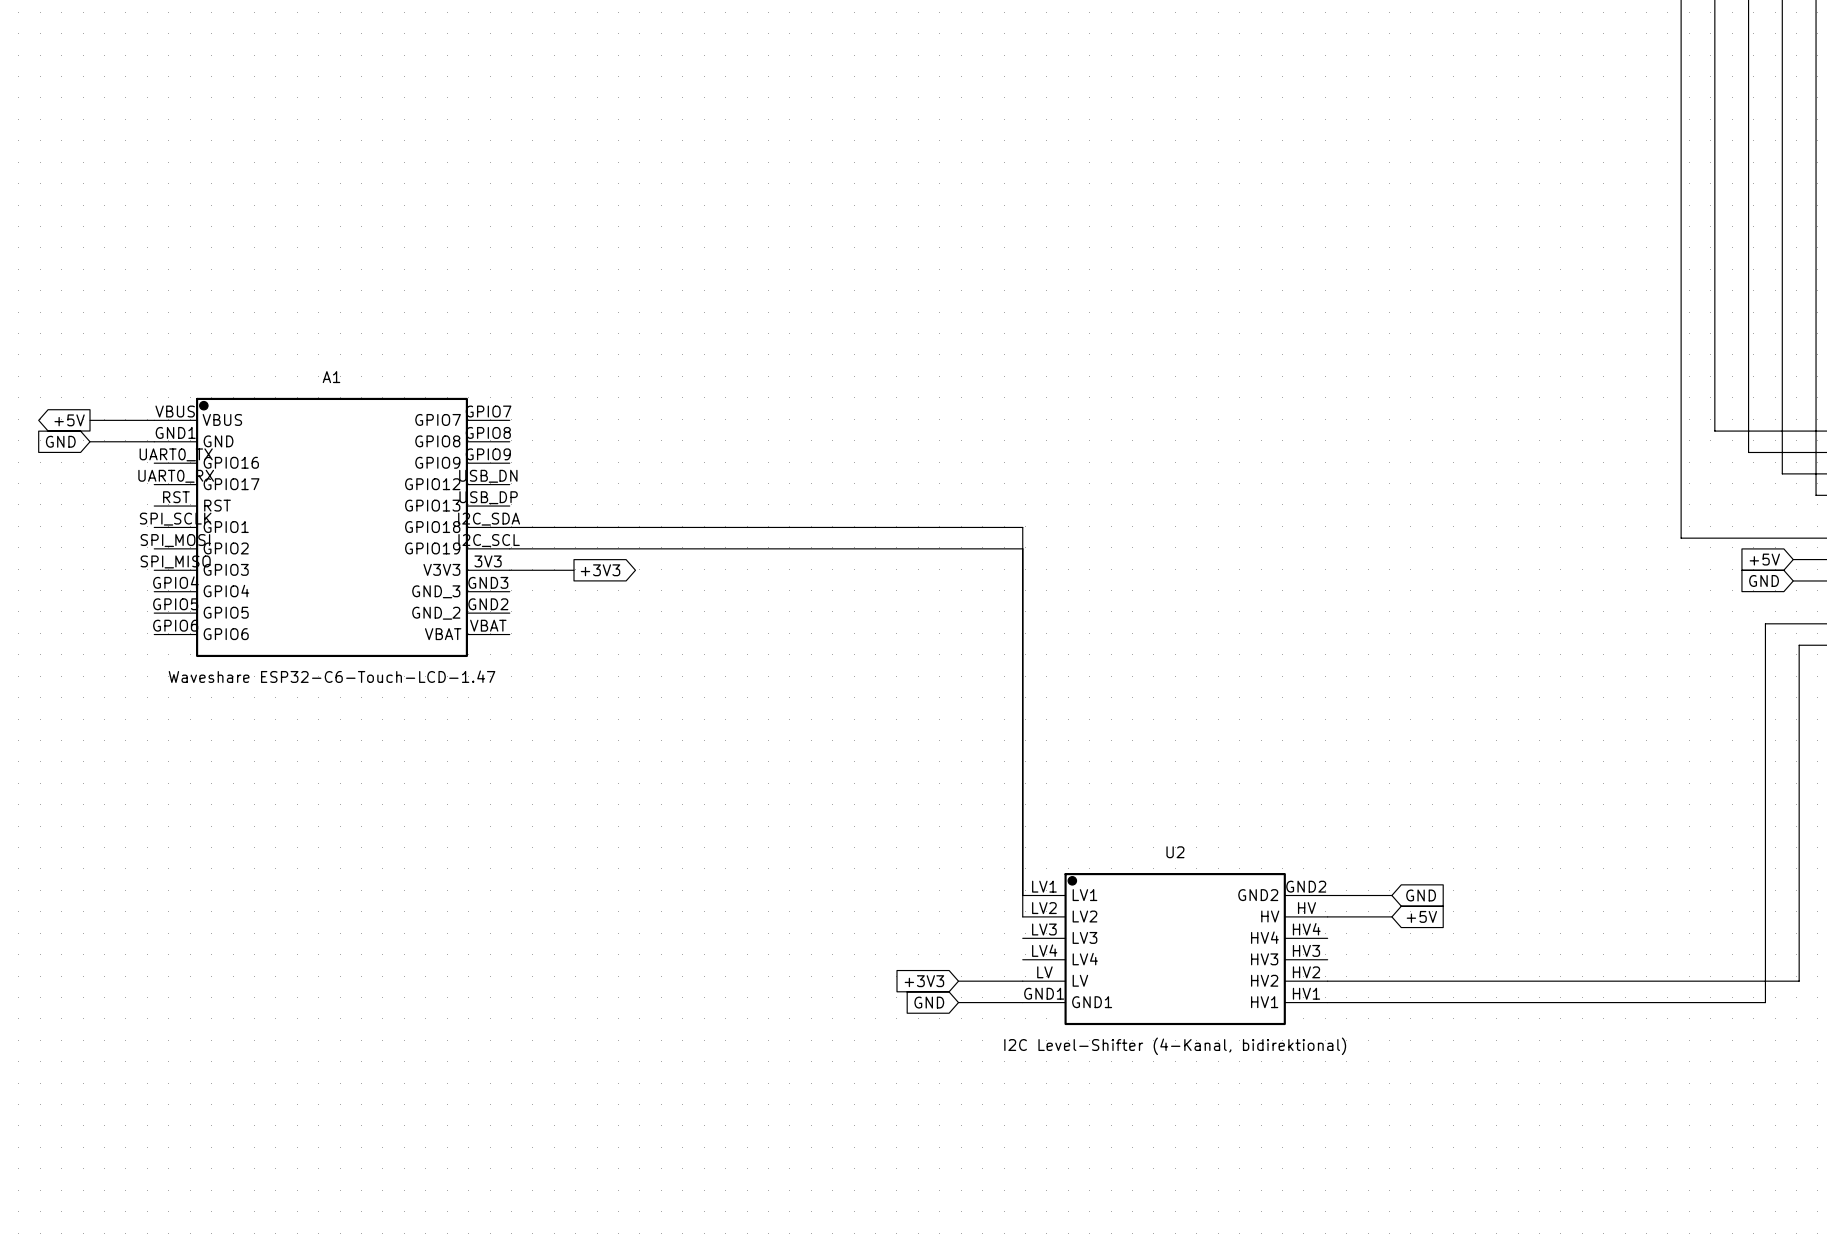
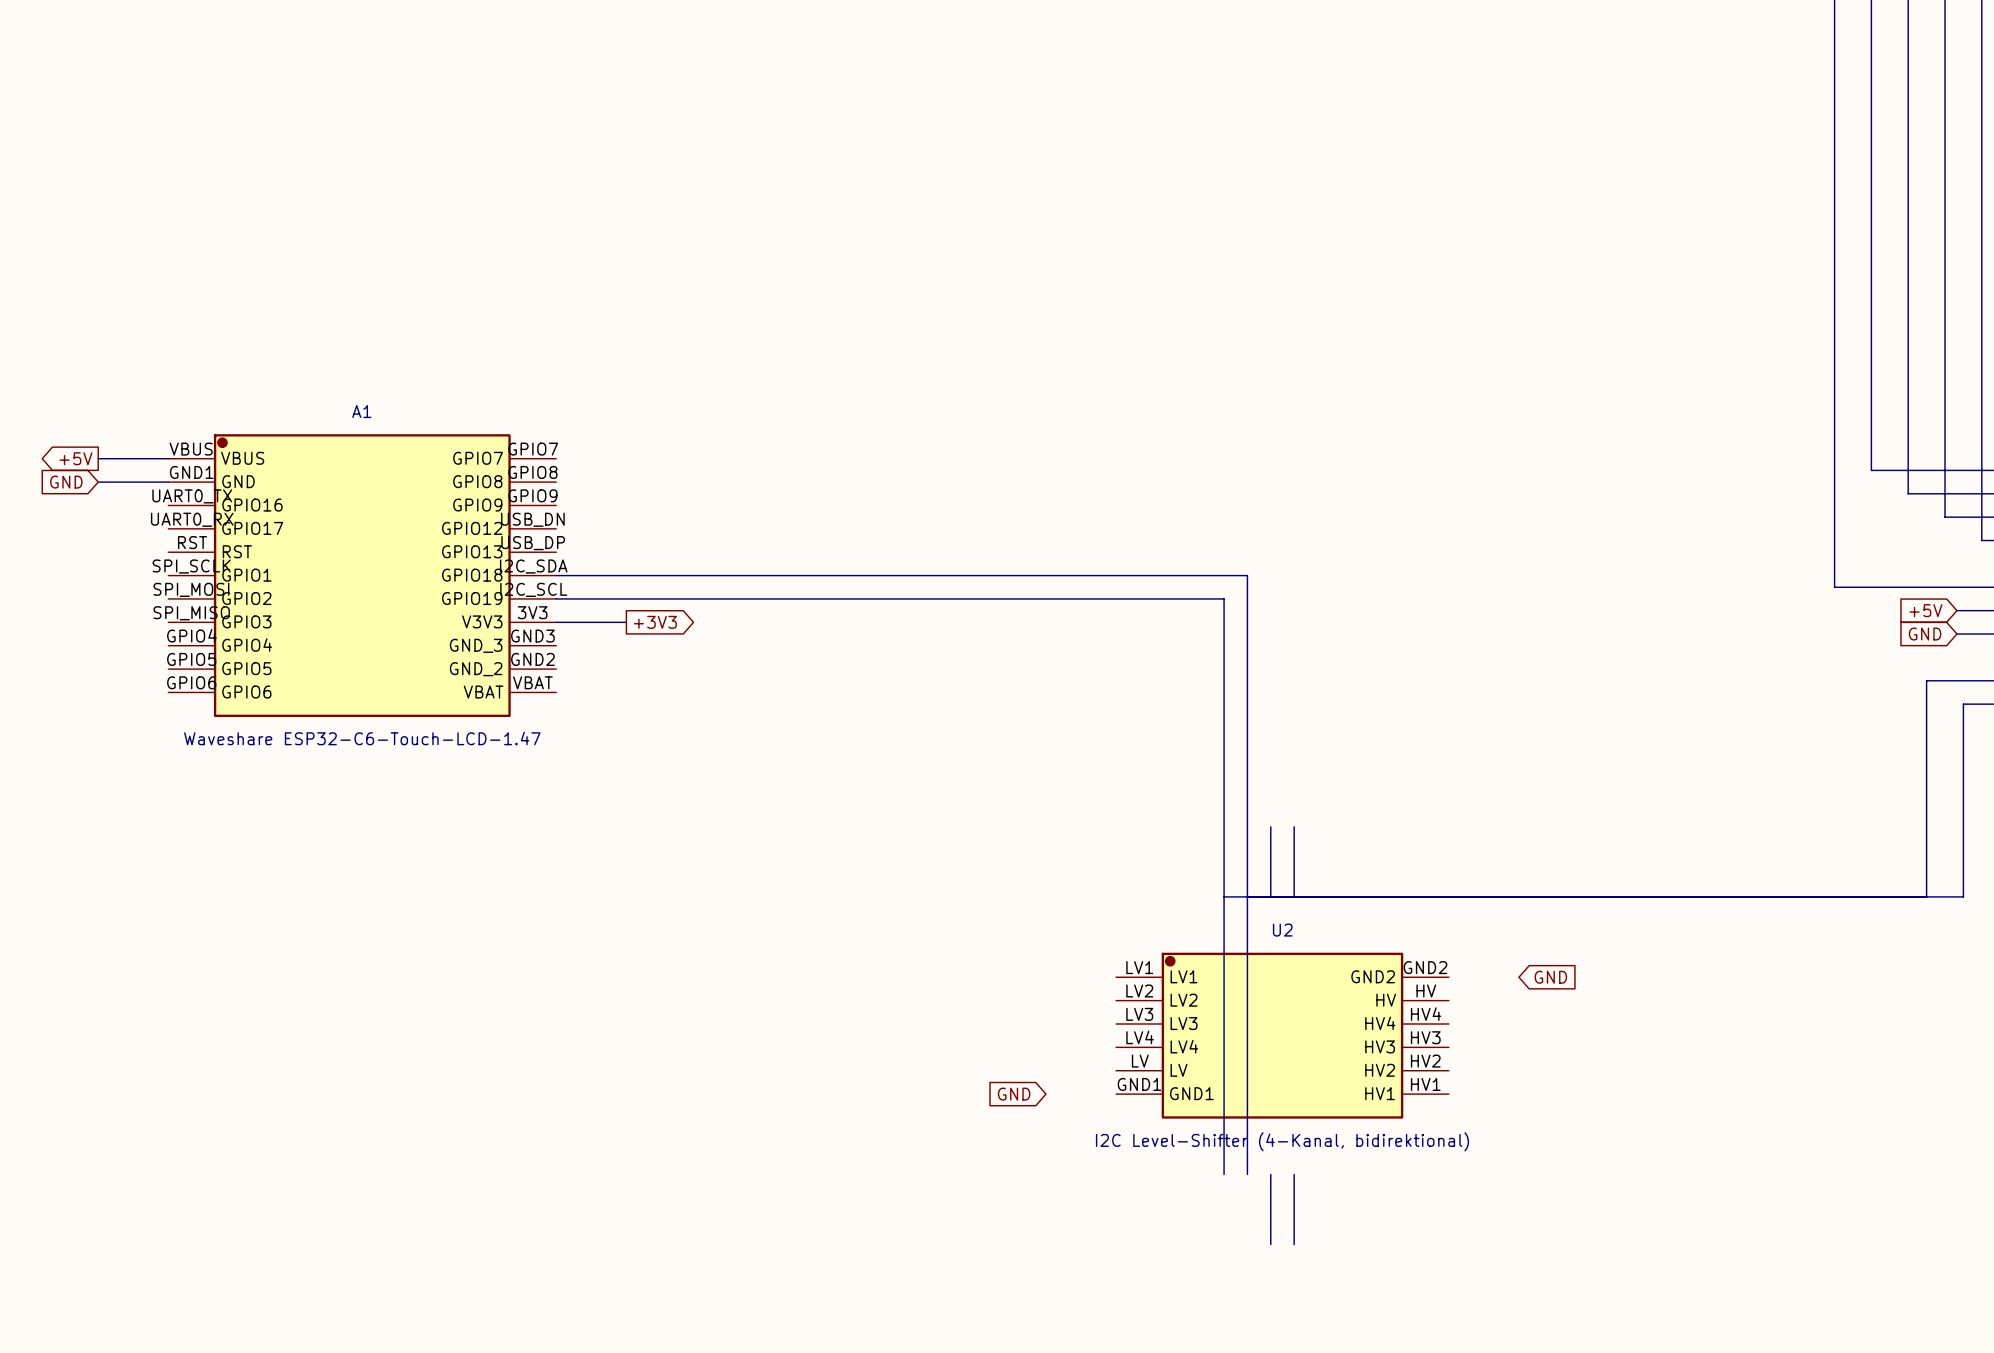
wire: (1022, 527) (1022, 916) -> (1116, 575) (1247, 575) (1247, 1174)
wire: none -> (1116, 598) (1224, 598) (1224, 1174)
wire: none -> (1270, 826) (1270, 896)
wire: none -> (1294, 826) (1294, 896)
wire: (1765, 821) (1765, 1002) (1327, 1002) -> none
wire: (1799, 821) (1799, 981) (1327, 981) -> (1963, 896) (1224, 896)
wire: (1327, 895) (1391, 895) -> none
wire: (1327, 916) (1391, 916) -> none
global label: +5V (1421, 916) -> none
global label: +3V3 (924, 981) -> none
wire: (958, 981) (1022, 981) -> none
wire: (958, 1002) (1022, 1002) -> none
wire: none -> (1270, 1174) (1270, 1244)
wire: none -> (1294, 1174) (1294, 1244)

